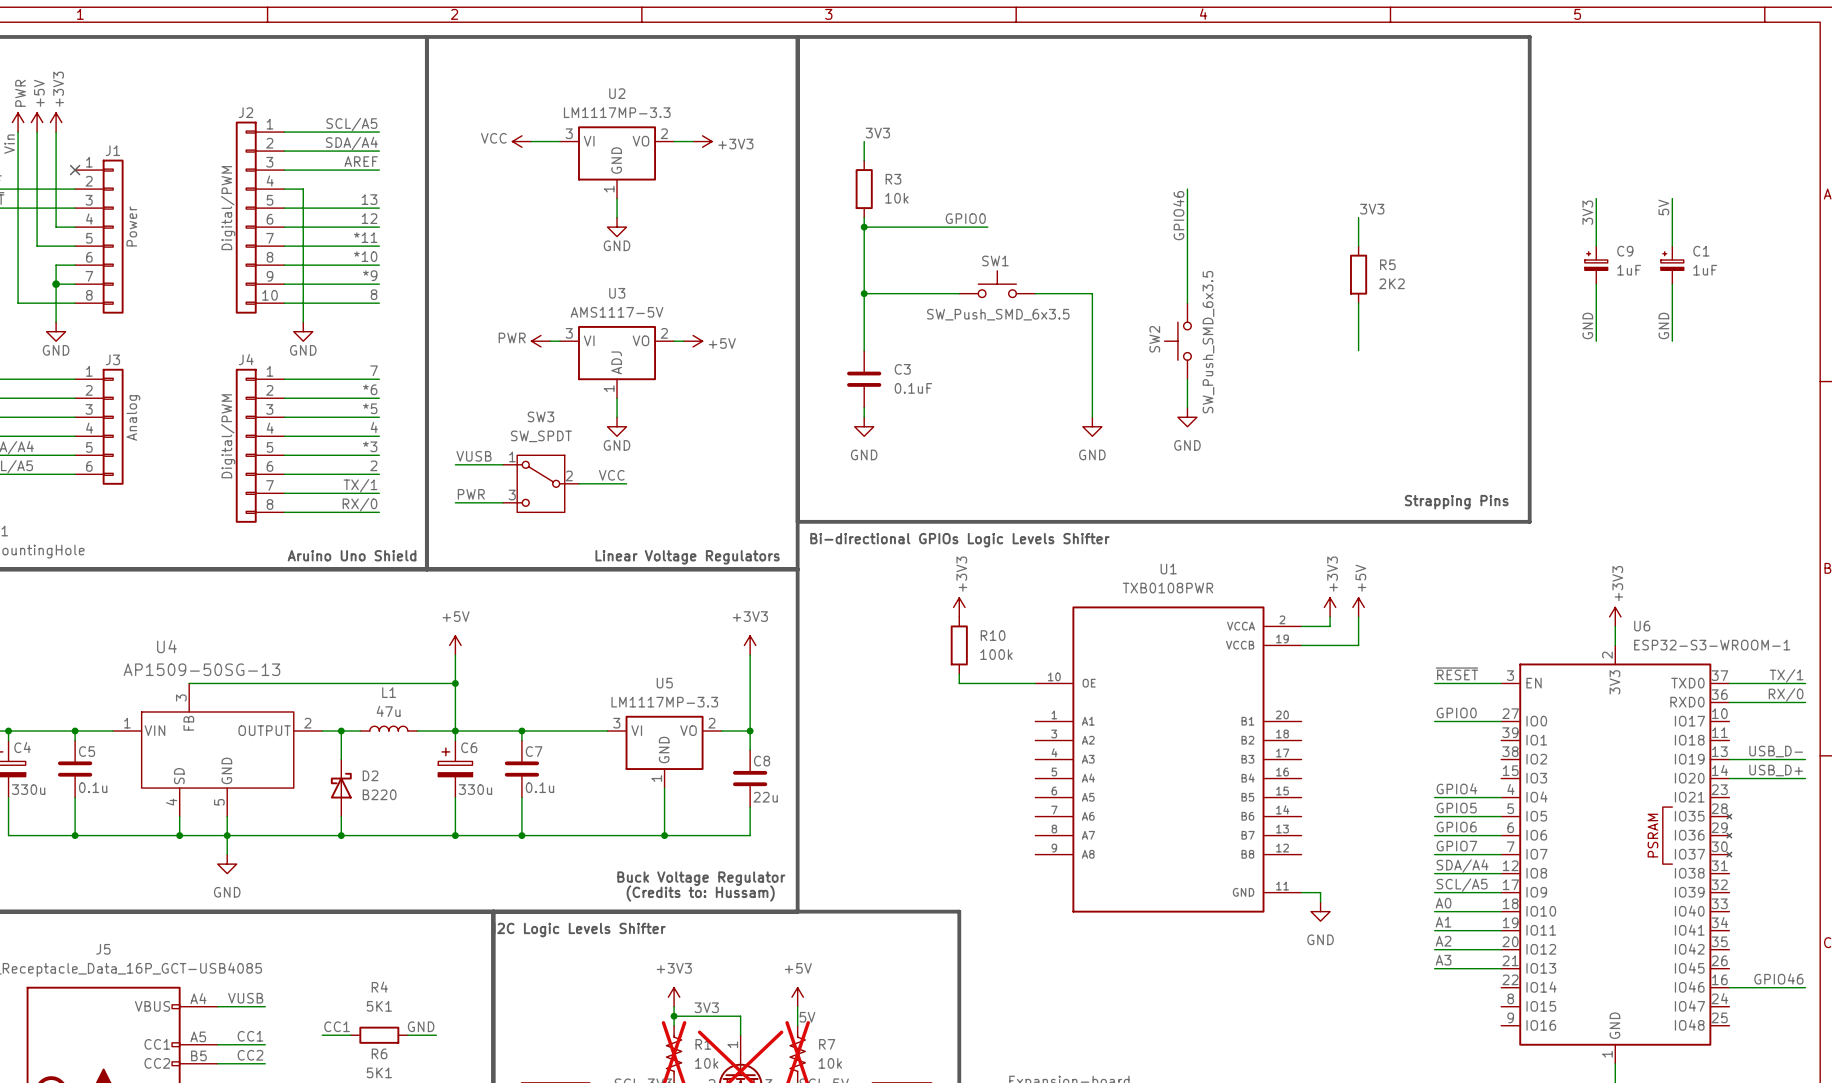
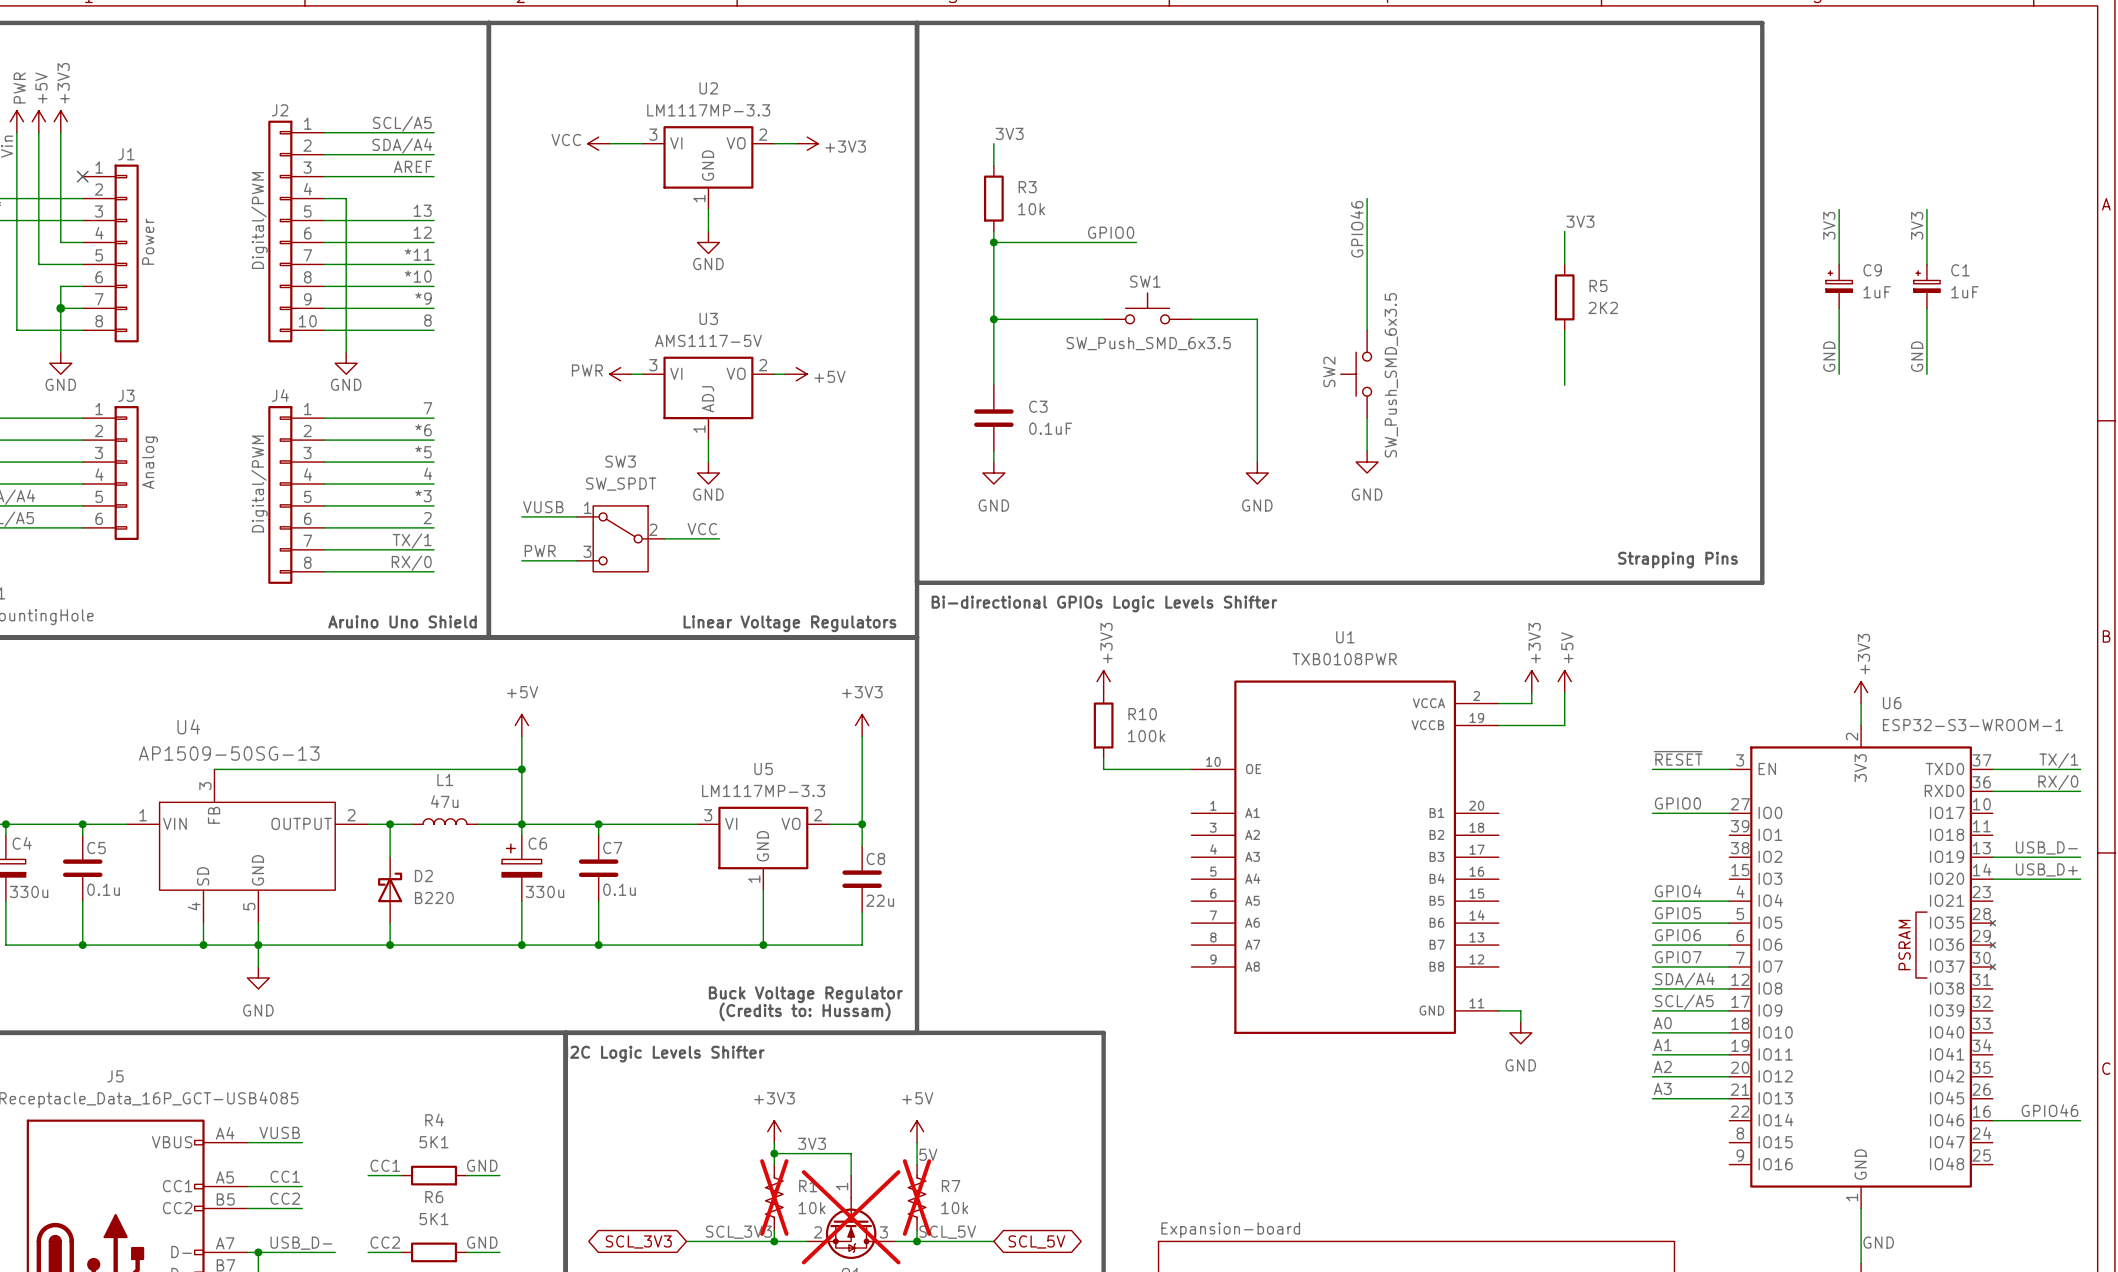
label: 5V (1663, 207) -> 3V3 (1917, 225)

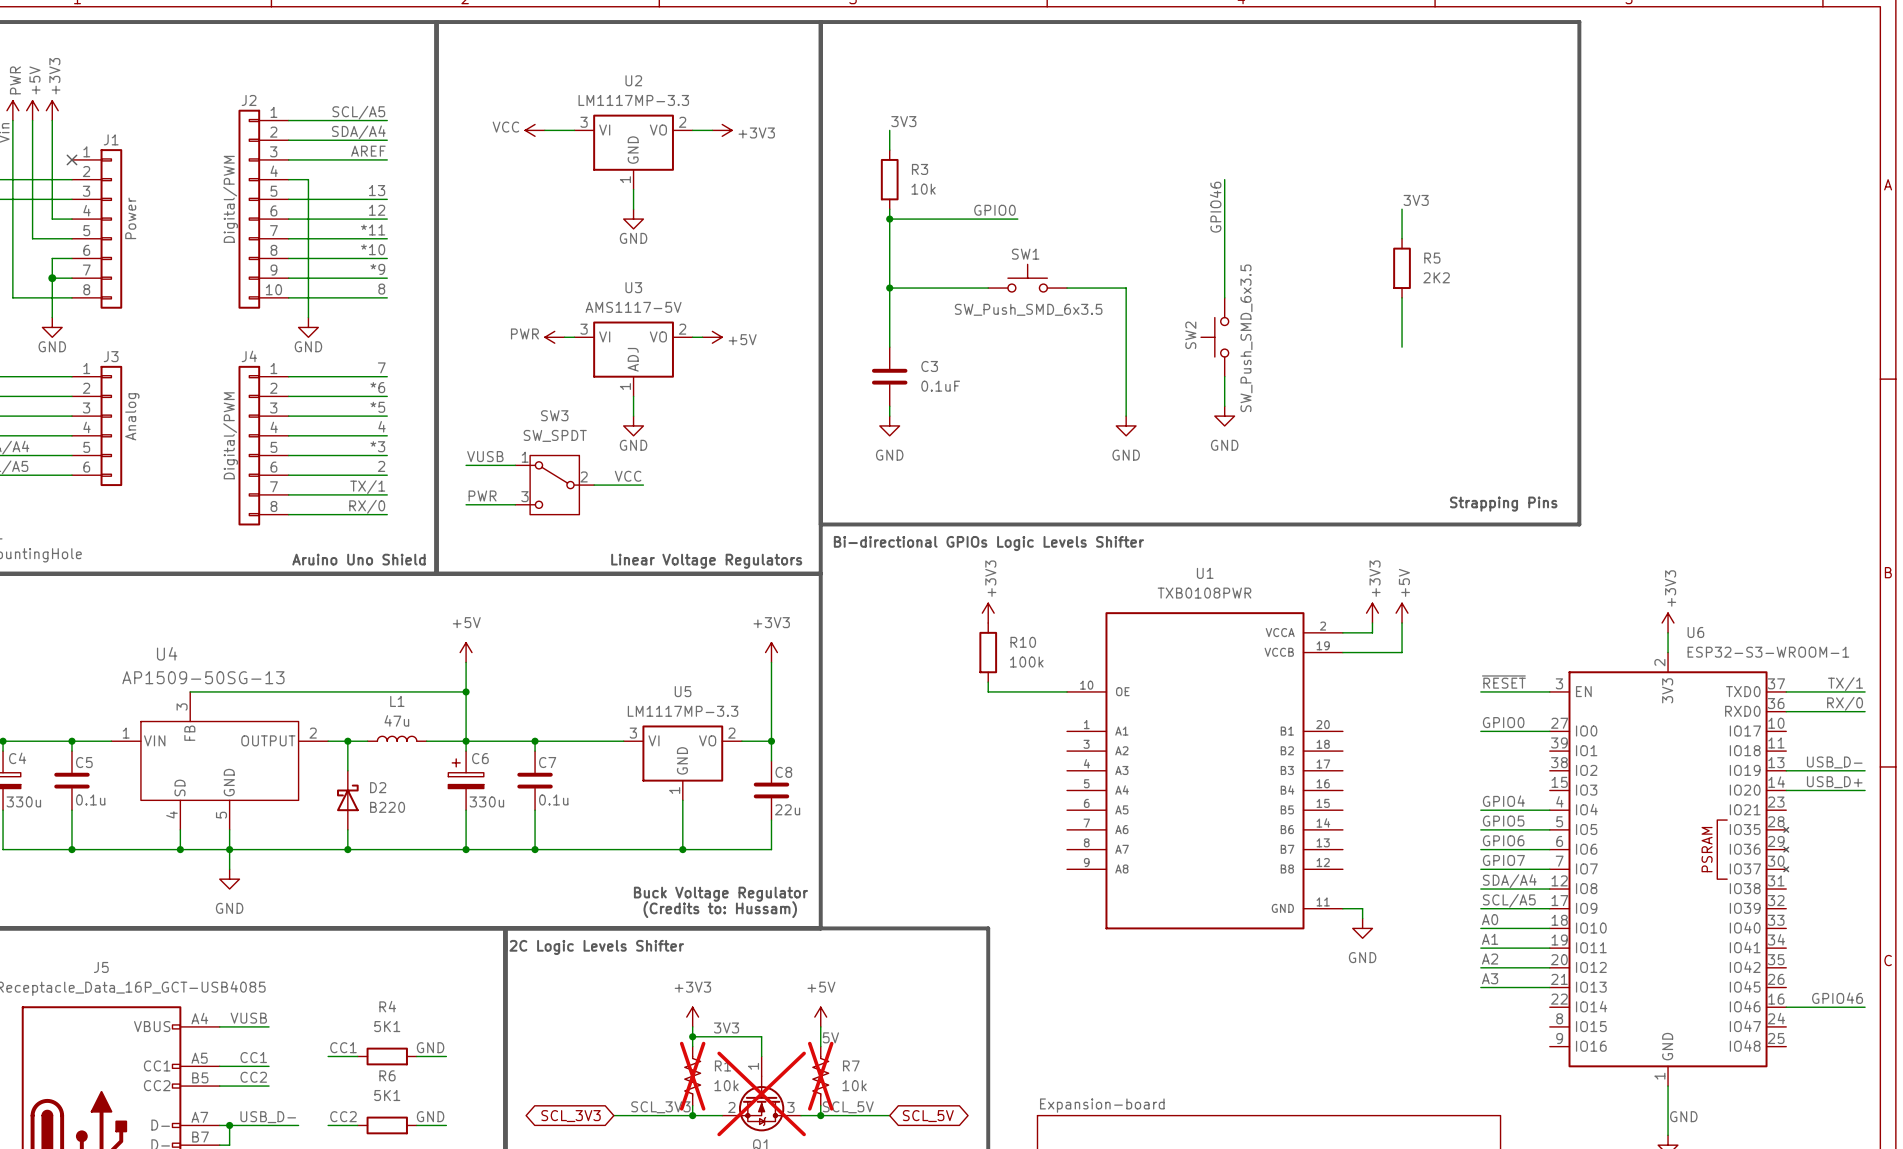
wire: (1839, 209) (1839, 264) -> none
wire: (1926, 209) (1926, 264) -> none
label: 3V3 (1829, 225) -> none
label: 3V3 (1917, 225) -> none
C9: 1uF (1839, 286) -> none
C1: 1uF (1926, 286) -> none
wire: (1839, 308) (1839, 374) -> none
wire: (1926, 308) (1926, 374) -> none
label: GND (1829, 356) -> none
label: GND (1917, 356) -> none

